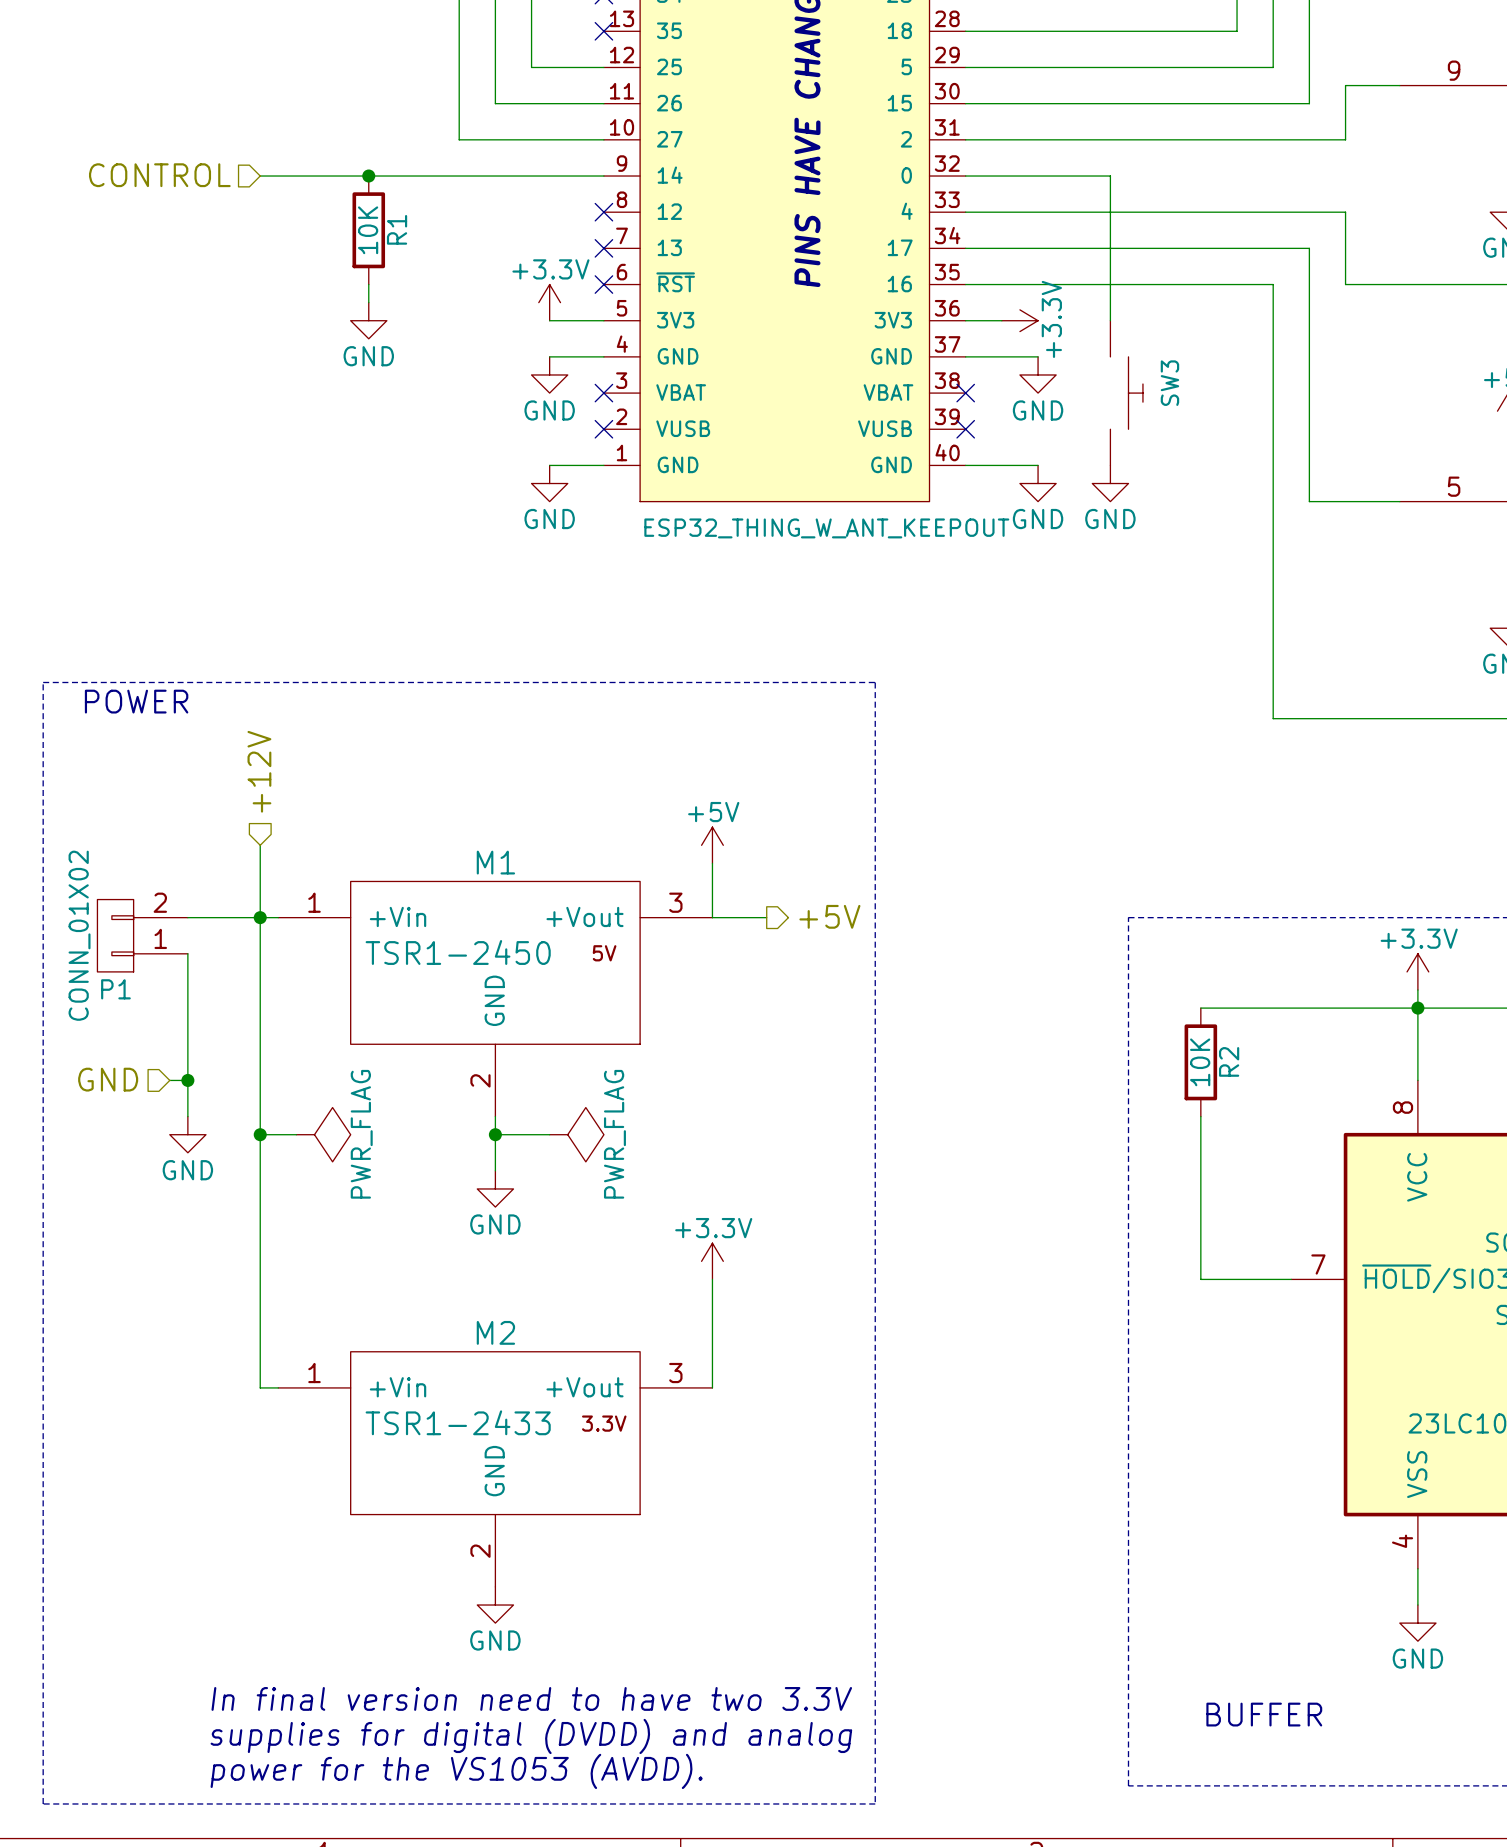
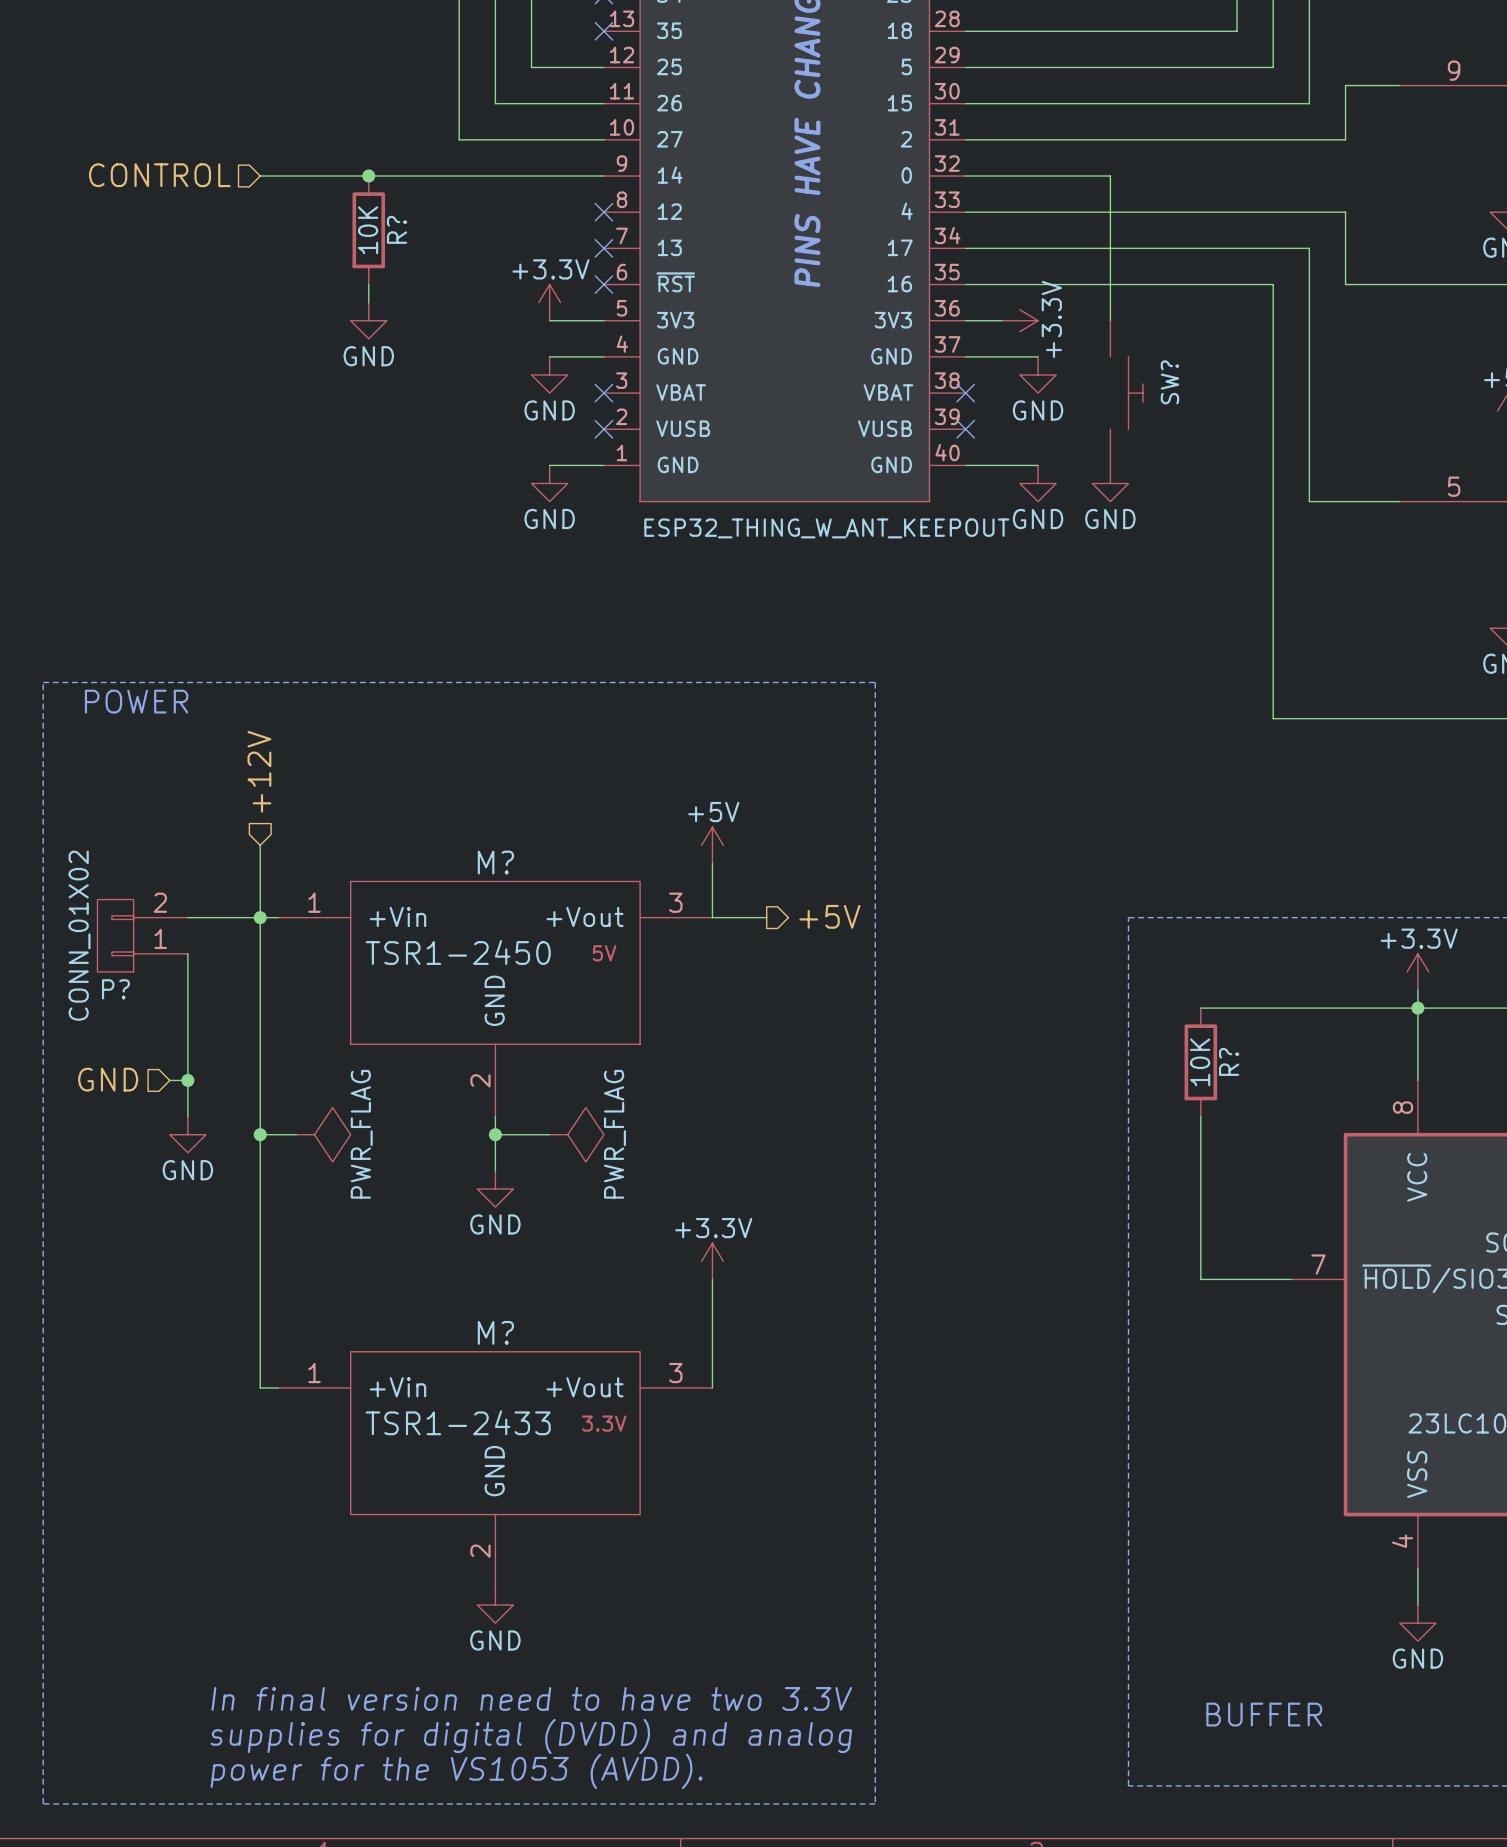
R1 name: R1 (397, 229) -> R? (397, 229)
SW3 name: SW3 (1169, 383) -> SW? (1169, 382)
M1 name: M1 (495, 862) -> M? (495, 862)
P1 name: P1 (115, 989) -> P? (115, 989)
R2 name: R2 (1229, 1061) -> R? (1229, 1061)
M2 name: M2 (495, 1332) -> M? (495, 1332)

